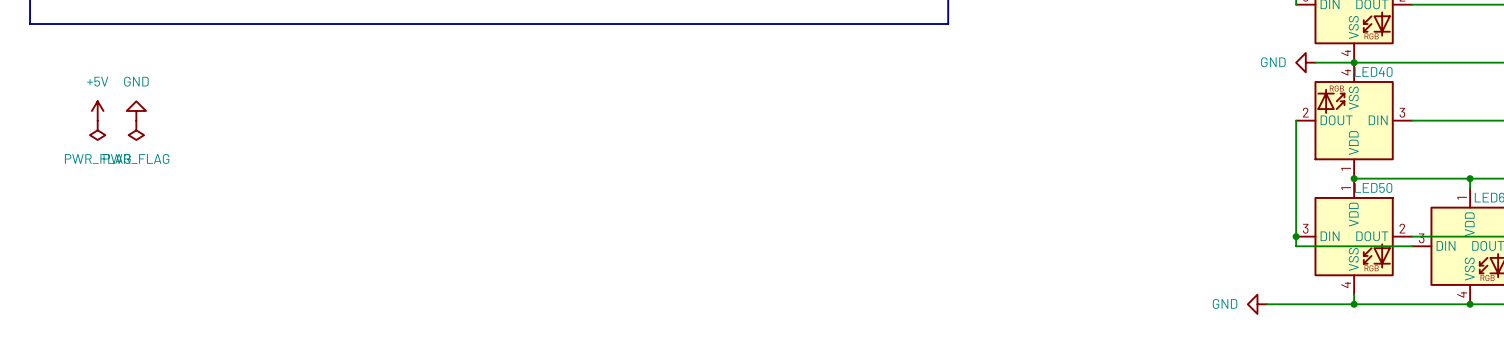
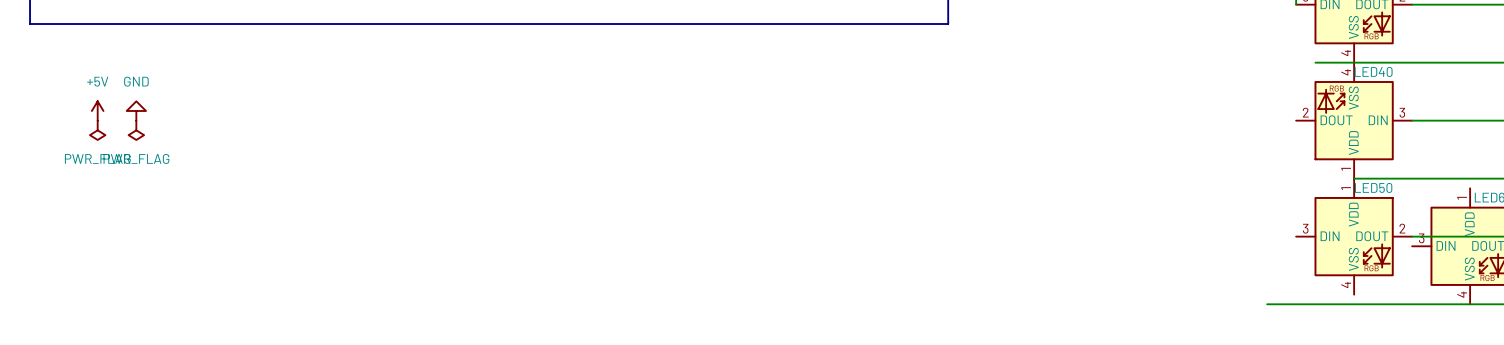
power symbol: GND (1305, 62) -> none
junction: (1354, 62) -> none
wire: (1296, 120) (1296, 246) (1412, 246) -> none
junction: (1354, 178) -> none
wire: (1470, 178) (1470, 188) -> none
junction: (1470, 178) -> none
junction: (1296, 236) -> none
wire: (1354, 294) (1354, 304) -> none
power symbol: GND (1257, 304) -> none
junction: (1354, 304) -> none
junction: (1470, 304) -> none

